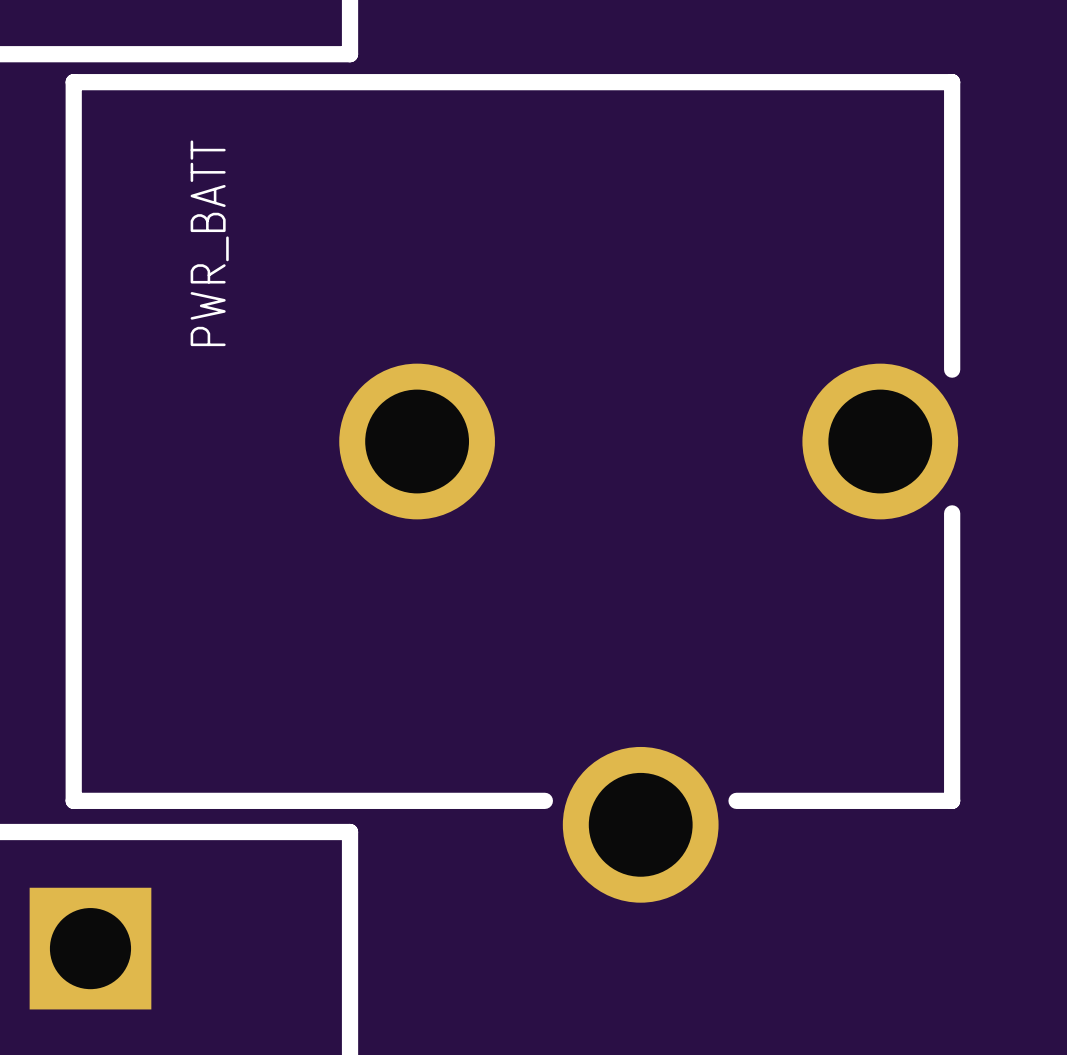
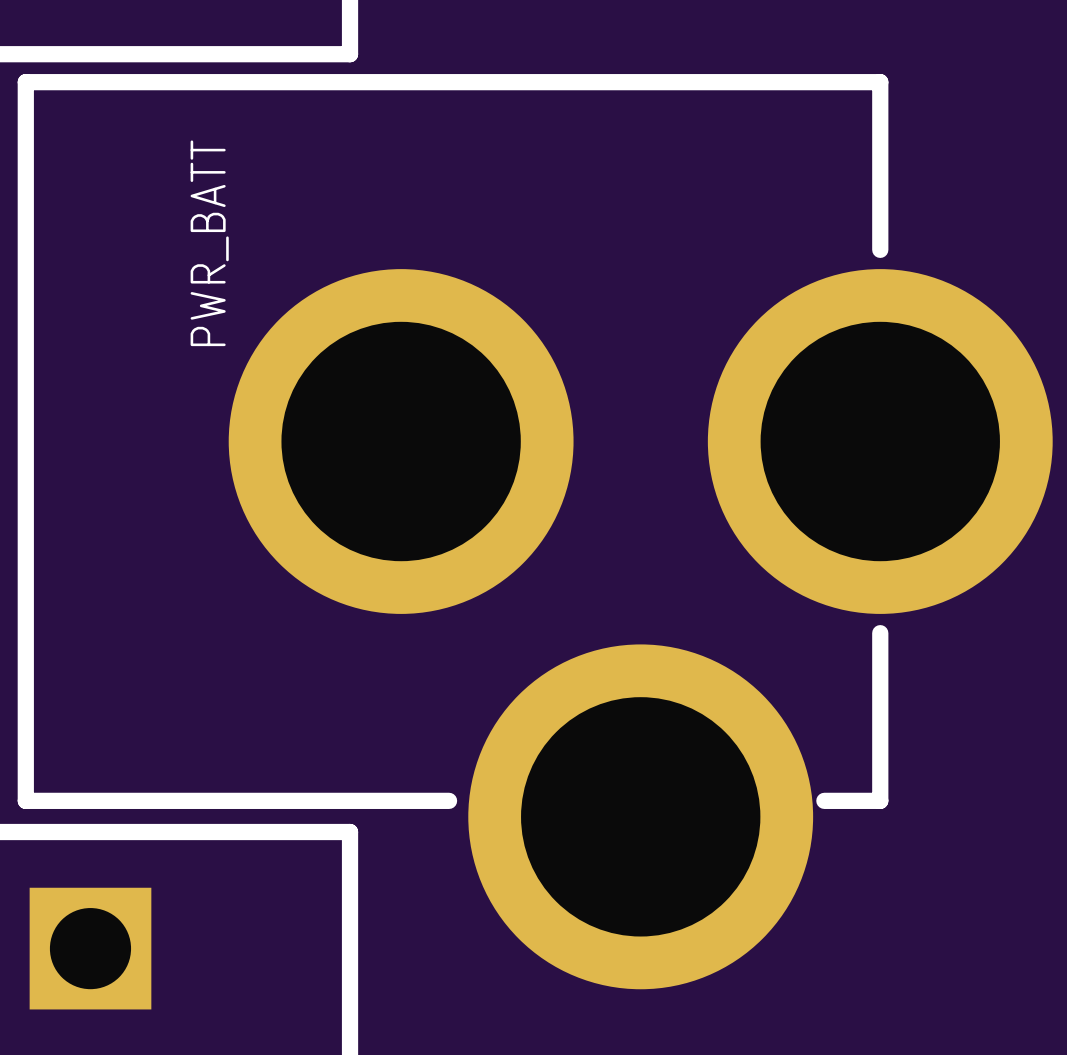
PWR_BATT footprint: [65, 74, 961, 903] -> [17, 74, 1053, 990]

